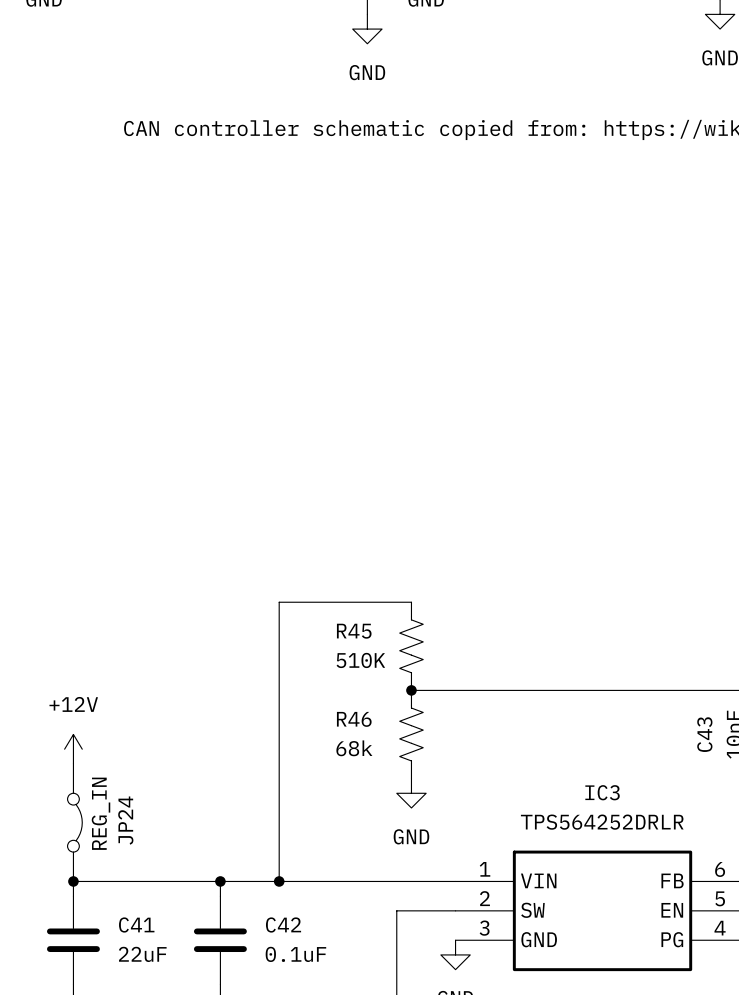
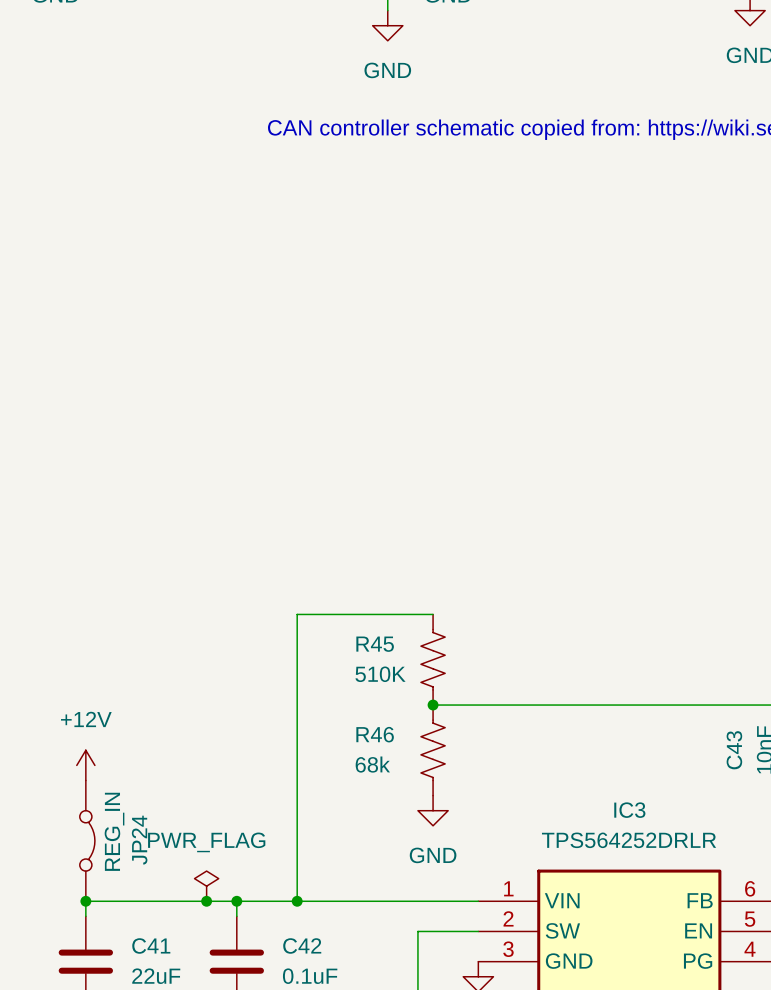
power symbol: none -> PWR_FLAG (206, 886)
junction: none -> (206, 901)

